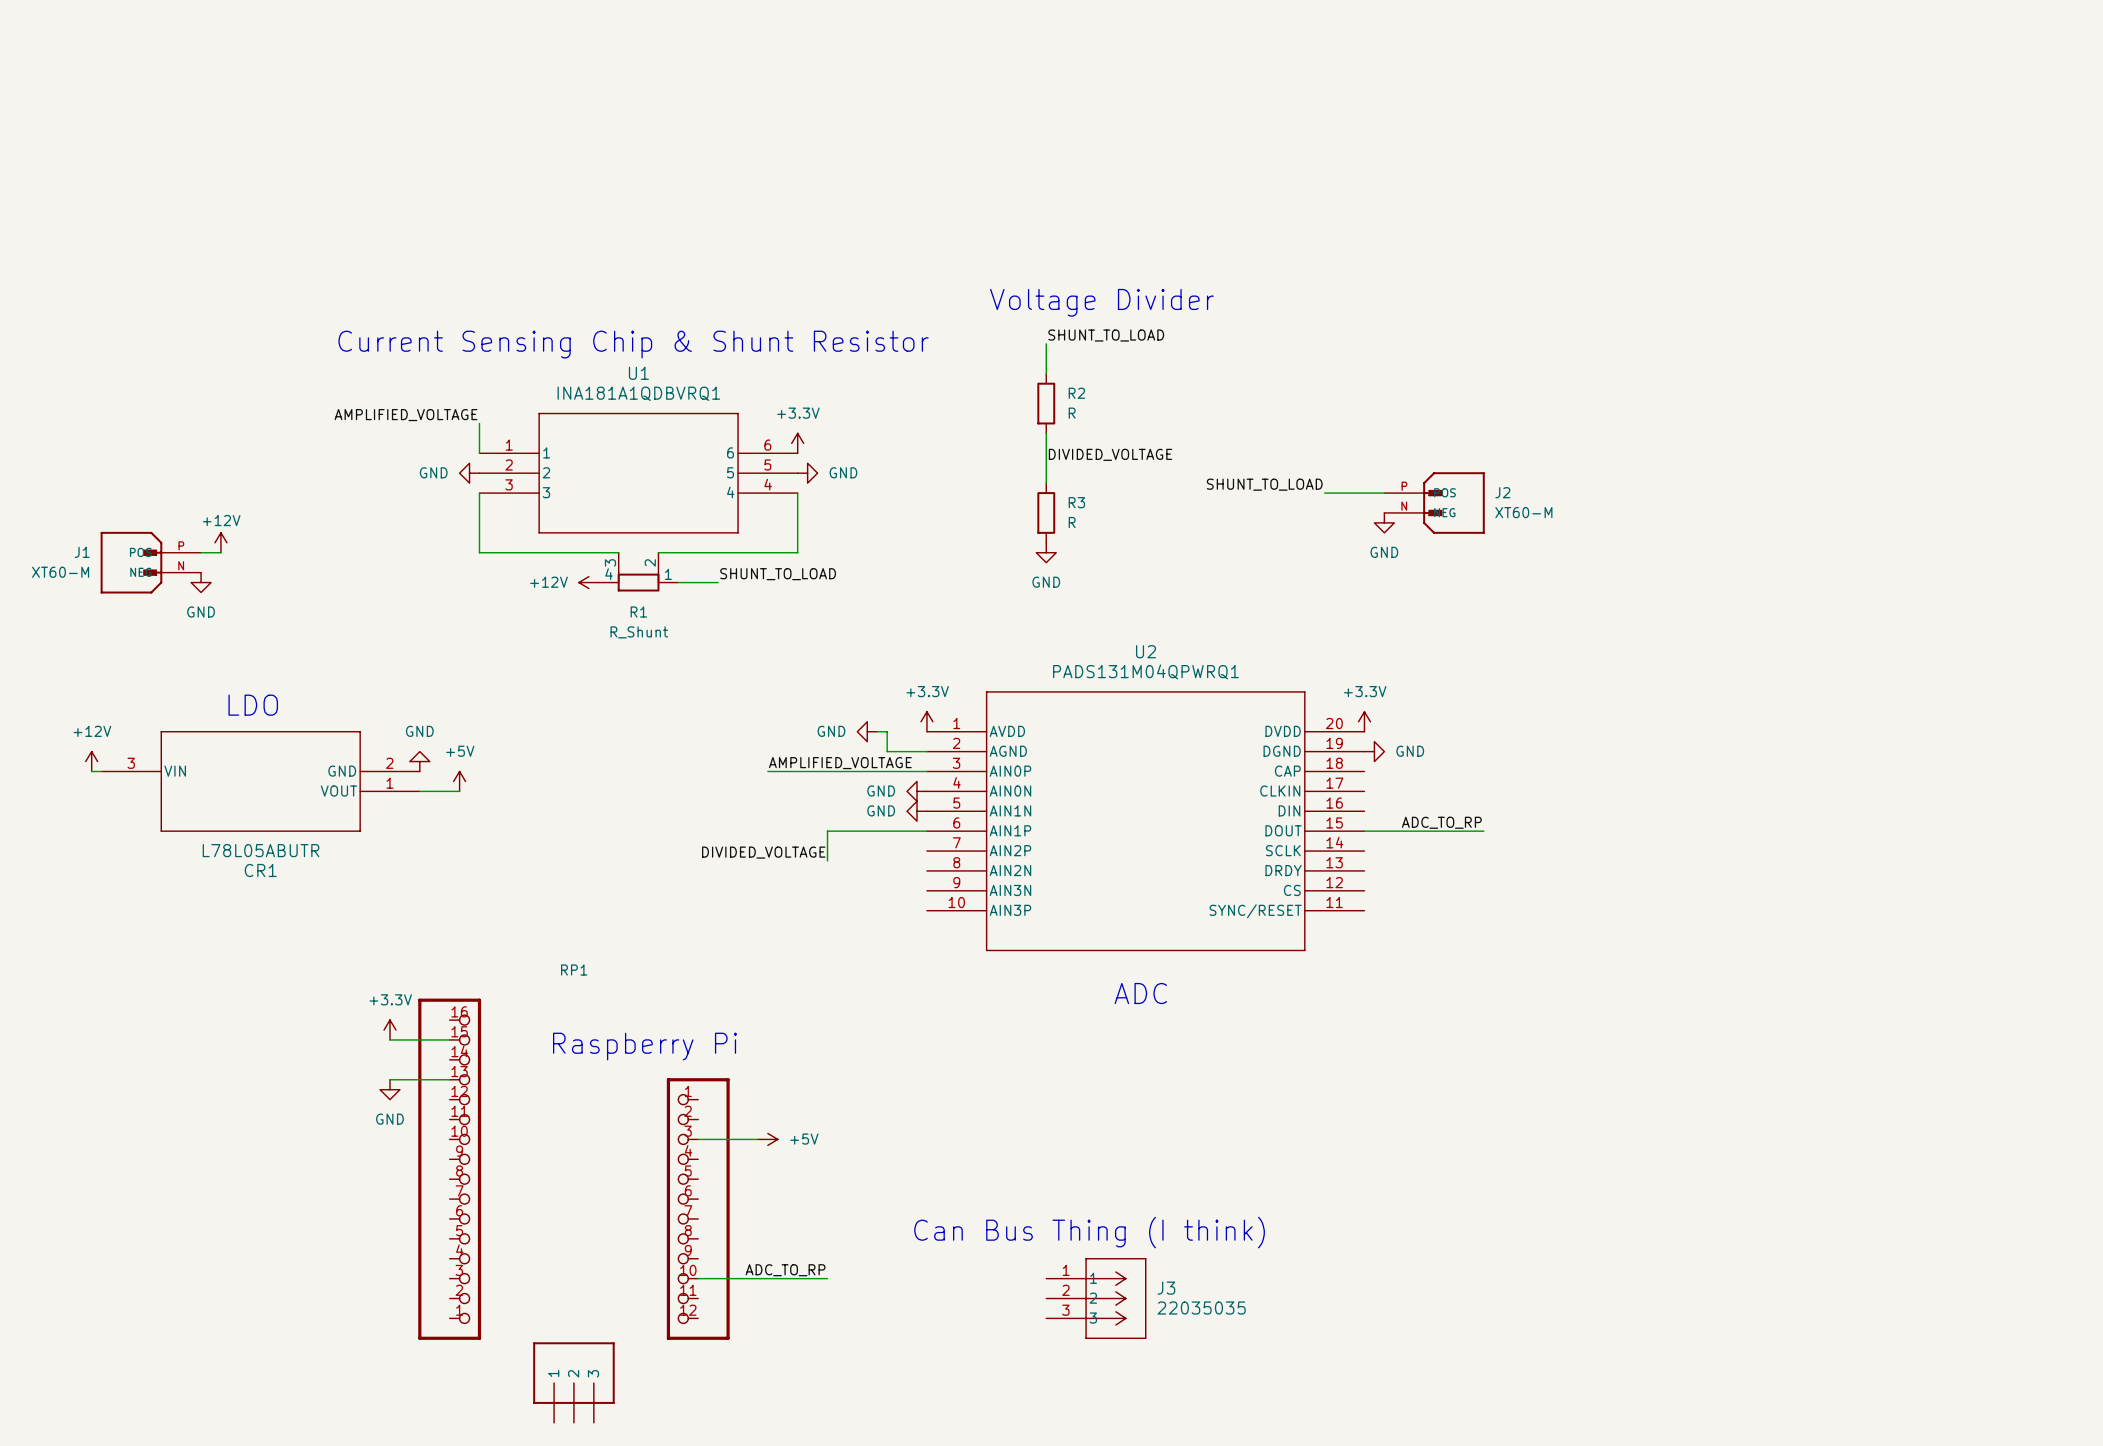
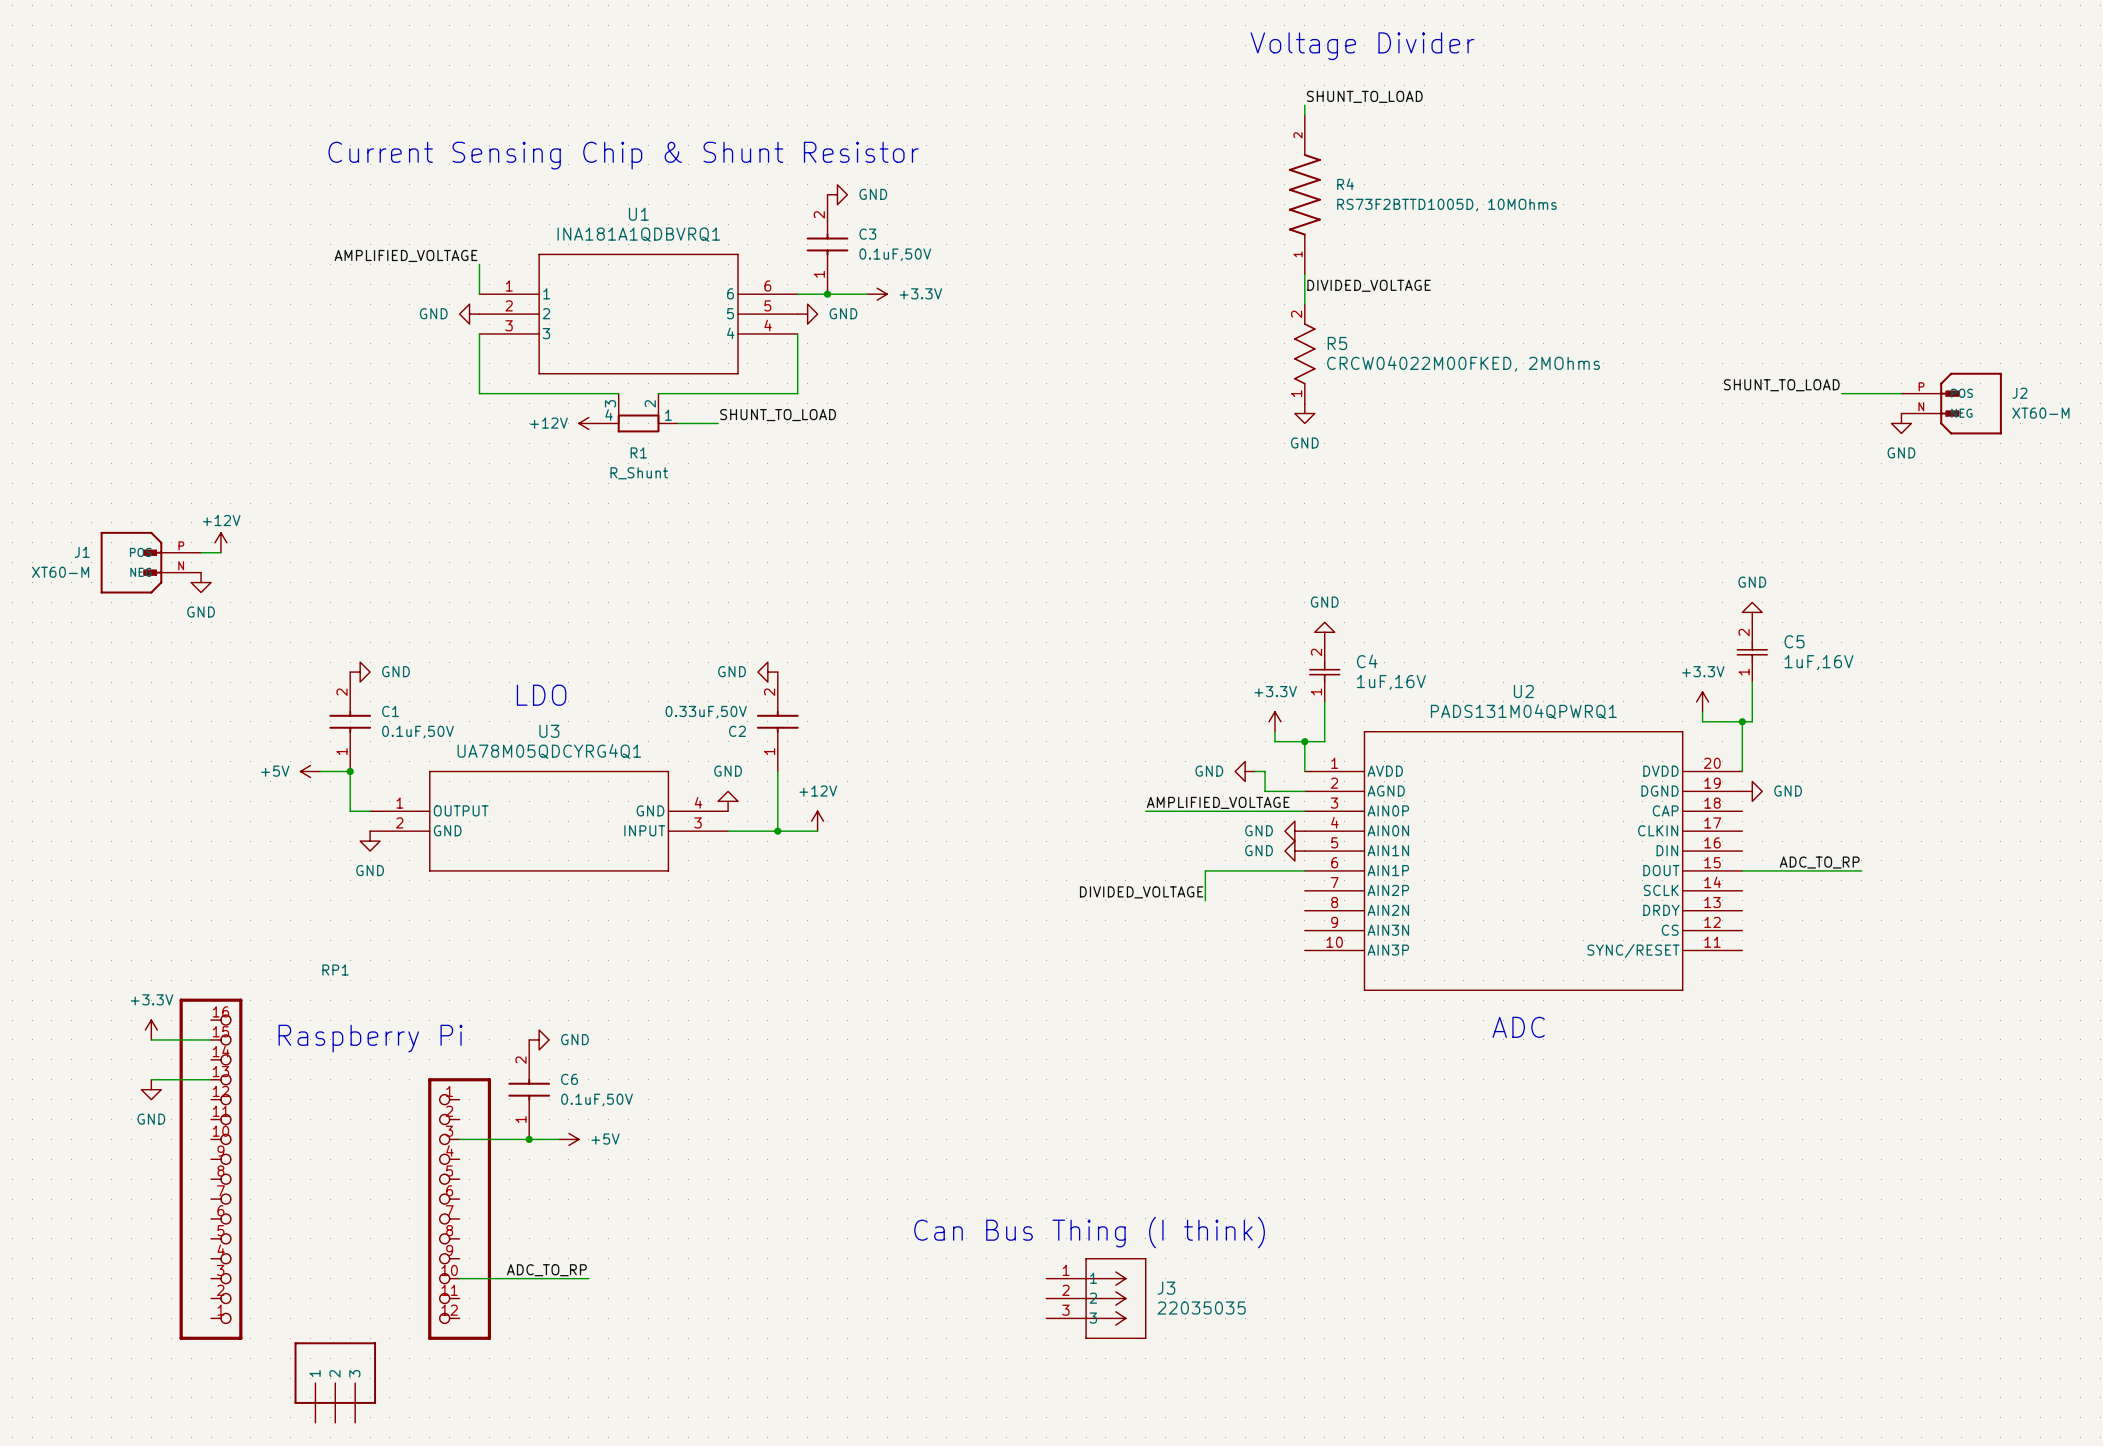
text: none -> Voltage Divider (1362, 46)
label: none -> SHUNT_TO_LOAD (1364, 96)
wire: none -> (1304, 105) (1304, 115)
power symbol: none -> GND (837, 194)
R4: none -> RS73F2BTTD1005D, 10MOhms (1304, 194)
C3: none -> 0.1uF,50V (827, 244)
wire: none -> (1304, 274) (1304, 304)
label: none -> DIVIDED_VOLTAGE (1369, 285)
wire: none -> (797, 294) (867, 294)
junction: none -> (827, 294)
text: Voltage Divider (1101, 302) -> none
power symbol: none -> GND (469, 314)
power symbol: none -> GND (807, 314)
label: SHUNT_TO_LOAD (1106, 335) -> none
wire: (1046, 343) (1046, 373) -> none
text position: Current Sensing Chip & Shunt Resistor (633, 344) -> Current Sensing Chip & Shunt Resistor (623, 155)
R5: none -> CRCW04022M00FKED, 2MOhms (1304, 353)
label: none -> SHUNT_TO_LOAD (1781, 385)
wire: none -> (1841, 393) (1901, 393)
R2: R (1046, 403) -> none
power symbol text position: +3.3V (798, 413) -> +3.3V (920, 293)
power symbol: none -> GND (1304, 413)
label position: AMPLIFIED_VOLTAGE (406, 415) -> AMPLIFIED_VOLTAGE (406, 255)
wire: (479, 423) (479, 453) -> (479, 264) (479, 294)
power symbol: none -> GND (1901, 423)
wire: (1046, 433) (1046, 483) -> none
power symbol rotation: 0° (797, 443) -> 90° clockwise (877, 294)
power symbol position: +3.3V (797, 443) -> +3.3V (877, 294)
label: DIVIDED_VOLTAGE (1110, 454) -> none
power symbol: GND (469, 473) -> none
U1 position: (638, 473) -> (638, 314)
power symbol: GND (807, 473) -> none
label: SHUNT_TO_LOAD (1264, 484) -> none
wire: (479, 493) (479, 552) (618, 552) -> (479, 333) (479, 393) (618, 393)
wire: (797, 493) (797, 552) (658, 552) -> (797, 333) (797, 393) (658, 393)
wire: (1324, 493) (1384, 493) -> none
J2 position: (1434, 503) -> (1951, 403)
R3: R (1046, 512) -> none
power symbol: GND (1384, 522) -> none
power symbol: GND (1046, 552) -> none
R1 position: (638, 572) -> (638, 413)
label position: SHUNT_TO_LOAD (778, 574) -> SHUNT_TO_LOAD (778, 415)
power symbol position: +12V (588, 582) -> +12V (588, 423)
wire: (678, 582) (718, 582) -> (678, 423) (718, 423)
power symbol: none -> GND (1752, 612)
power symbol: none -> GND (1324, 632)
C5: none -> 1uF,16V (1752, 652)
power symbol: none -> GND (360, 672)
power symbol: none -> GND (767, 672)
C4: none -> 1uF,16V (1324, 672)
wire: none -> (1752, 682) (1752, 721) (1702, 721) (1702, 711)
text: none -> LDO (541, 695)
wire: none -> (1324, 701) (1324, 741) (1274, 741) (1274, 731)
power symbol: none -> +3.3V (1702, 701)
text: LDO (253, 705) -> none
C1: none -> 0.1uF,50V (350, 721)
C2: none -> 0.33uF,50V (777, 721)
power symbol: +3.3V (926, 721) -> none
power symbol position: +3.3V (1364, 721) -> +3.3V (1274, 721)
wire: none -> (1742, 721) (1742, 771)
junction: none -> (1742, 721)
power symbol: GND (867, 731) -> none
wire: (877, 731) (887, 731) (887, 751) (926, 751) -> none
junction: none -> (1304, 741)
power symbol: GND (1374, 751) -> none
power symbol: +12V (91, 761) -> none
power symbol: GND (419, 761) -> none
label: AMPLIFIED_VOLTAGE (840, 763) -> none
wire: (91, 771) (101, 771) -> none
wire: none -> (320, 771) (350, 771) (350, 811) (370, 811)
junction: none -> (350, 771)
wire: (767, 771) (926, 771) -> none
wire: none -> (777, 771) (777, 831)
power symbol: none -> GND (1245, 771)
wire: none -> (1255, 771) (1265, 771) (1265, 791) (1304, 791)
CR1: L78L05ABUTR (260, 781) -> none
power symbol rotation: 0° (459, 781) -> 90° counterclockwise (310, 771)
power symbol position: +5V (459, 781) -> +5V (310, 771)
wire: (419, 791) (459, 791) -> none
power symbol: GND (917, 791) -> none
power symbol: none -> GND (1752, 791)
power symbol: none -> GND (728, 801)
label: none -> AMPLIFIED_VOLTAGE (1218, 802)
power symbol: GND (917, 811) -> none
wire: none -> (1145, 811) (1304, 811)
U3: none -> UA78M05QDCYRG4Q1 (549, 821)
power symbol: none -> +12V (817, 821)
U2 position: (1145, 821) -> (1523, 860)
label: ADC_TO_RP (1441, 822) -> none
wire: none -> (728, 831) (817, 831)
junction: none -> (777, 831)
wire: (926, 831) (827, 831) (827, 860) -> none
power symbol: none -> GND (1294, 831)
wire: (1364, 831) (1483, 831) -> none
power symbol: none -> GND (370, 841)
power symbol: none -> GND (1294, 851)
label: DIVIDED_VOLTAGE (763, 852) -> none
label: none -> ADC_TO_RP (1819, 862)
wire: none -> (1304, 870) (1205, 870) (1205, 900)
wire: none -> (1742, 870) (1861, 870)
label: none -> DIVIDED_VOLTAGE (1141, 892)
text: ADC (1140, 993) -> none
text: none -> ADC (1518, 1027)
power symbol: none -> +3.3V (151, 1030)
power symbol: +3.3V (389, 1030) -> none
text: none -> Raspberry Pi (370, 1038)
wire: none -> (151, 1039) (211, 1039)
wire: (389, 1039) (449, 1039) -> none
power symbol: none -> GND (539, 1039)
text: Raspberry Pi (645, 1046) -> none
wire: none -> (151, 1079) (211, 1079)
wire: (389, 1079) (449, 1079) -> none
power symbol: none -> GND (151, 1089)
power symbol: GND (389, 1089) -> none
C6: none -> 0.1uF,50V (529, 1089)
wire: none -> (459, 1139) (559, 1139)
junction: none -> (529, 1139)
power symbol: none -> +5V (568, 1139)
wire: (698, 1139) (757, 1139) -> none
power symbol: +5V (767, 1139) -> none
RP1 position: (573, 1210) -> (335, 1210)
label: none -> ADC_TO_RP (546, 1270)
label: ADC_TO_RP (785, 1270) -> none
wire: none -> (459, 1278) (588, 1278)
wire: (698, 1278) (827, 1278) -> none

